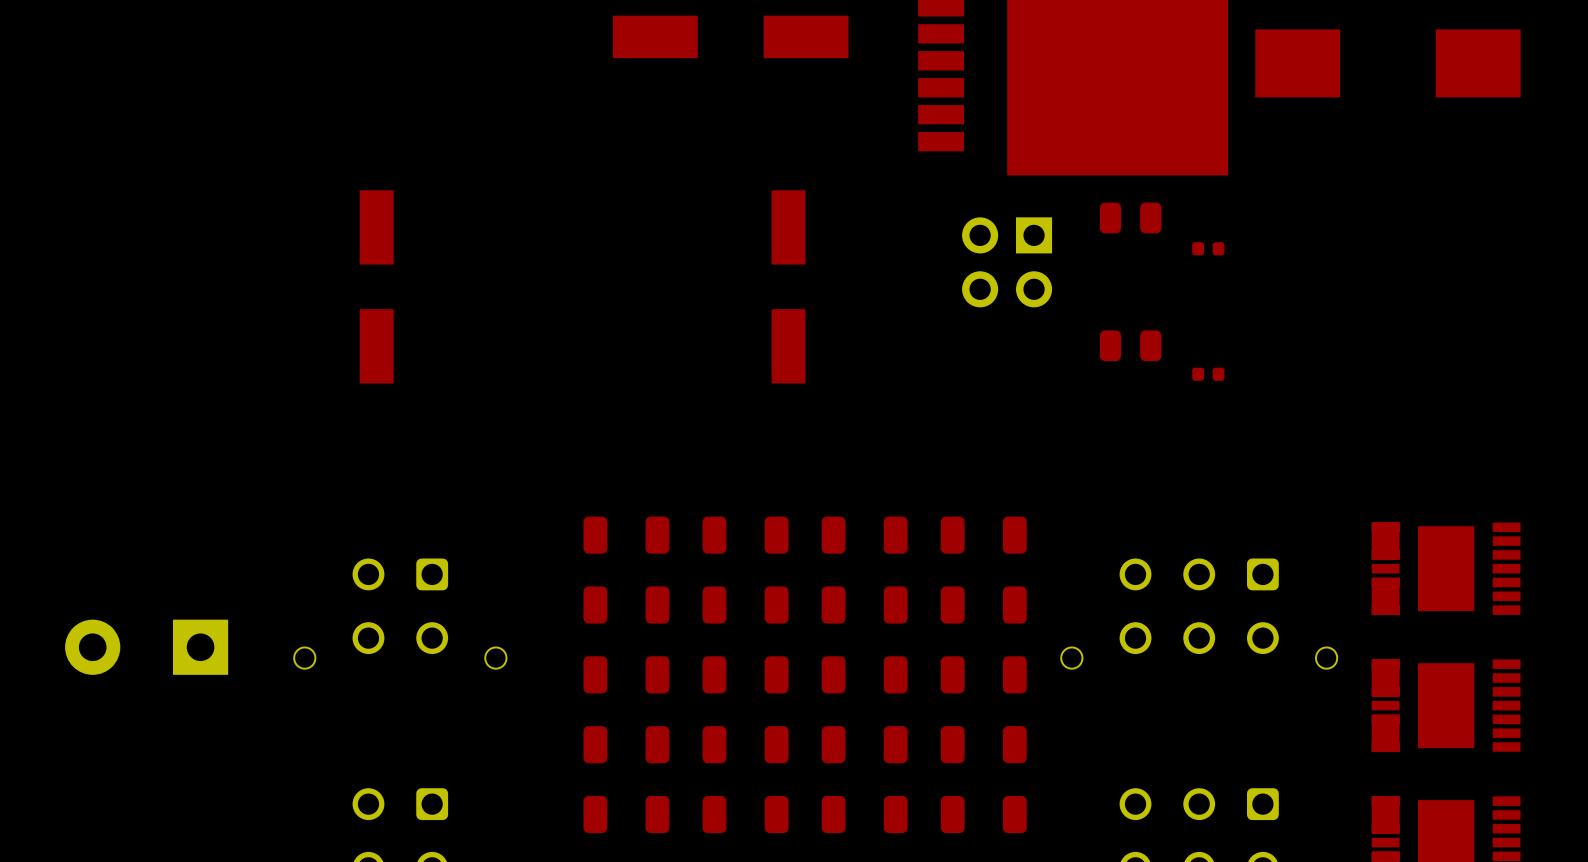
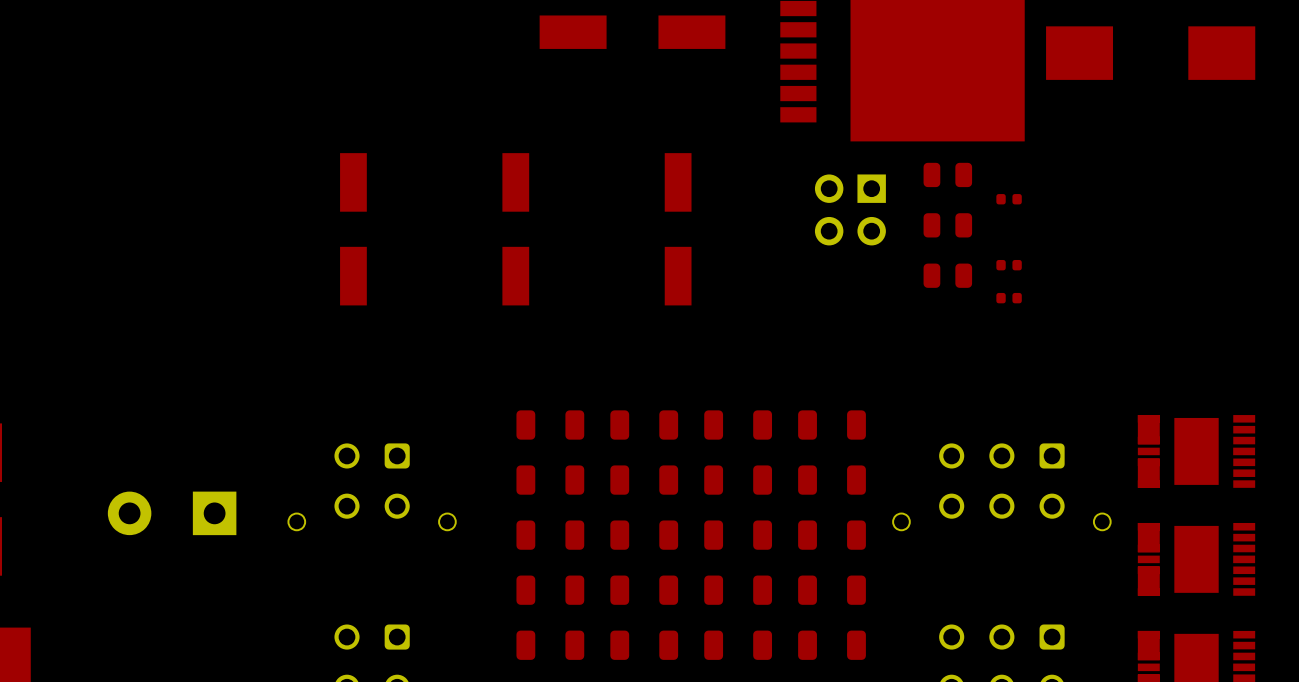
part: none -> (947, 225)
part: none -> (515, 229)
part: none -> (1009, 265)

